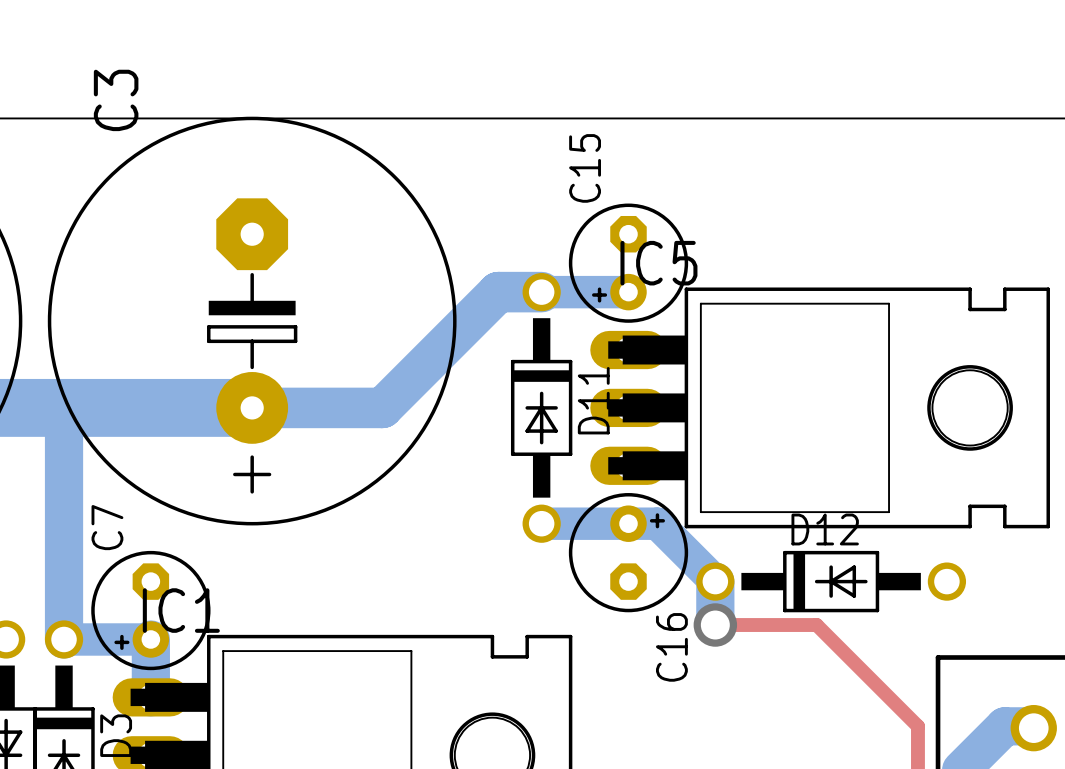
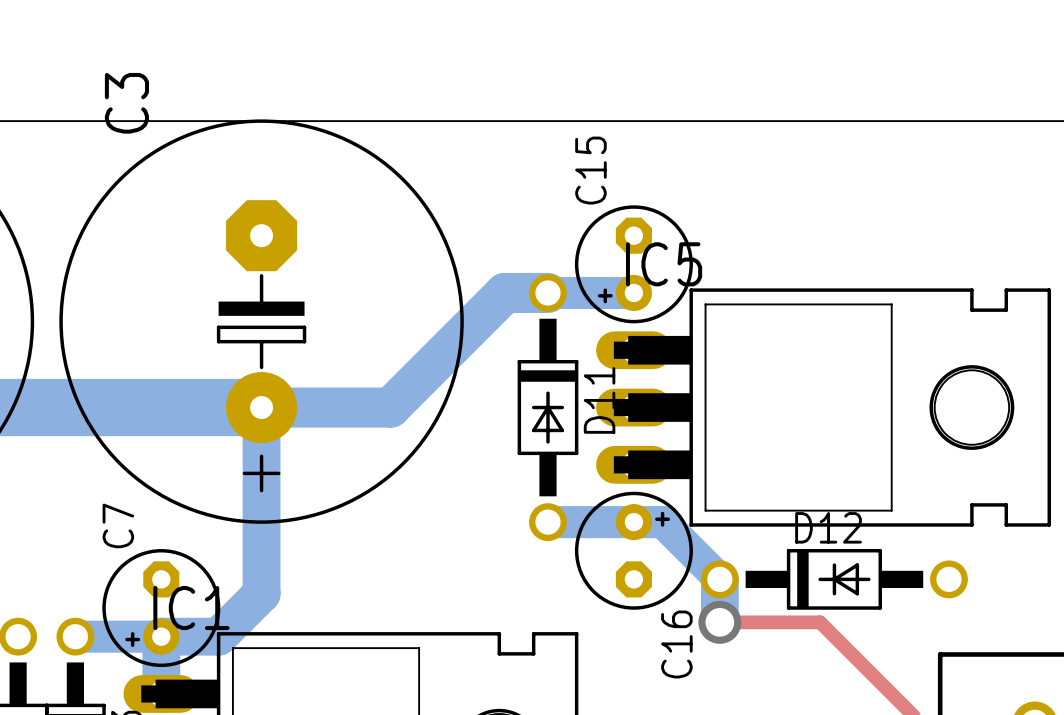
bottom track: (252, 407) (78, 407) (64, 422) (64, 639) -> (261, 407) (261, 593) (218, 636) (161, 636)

